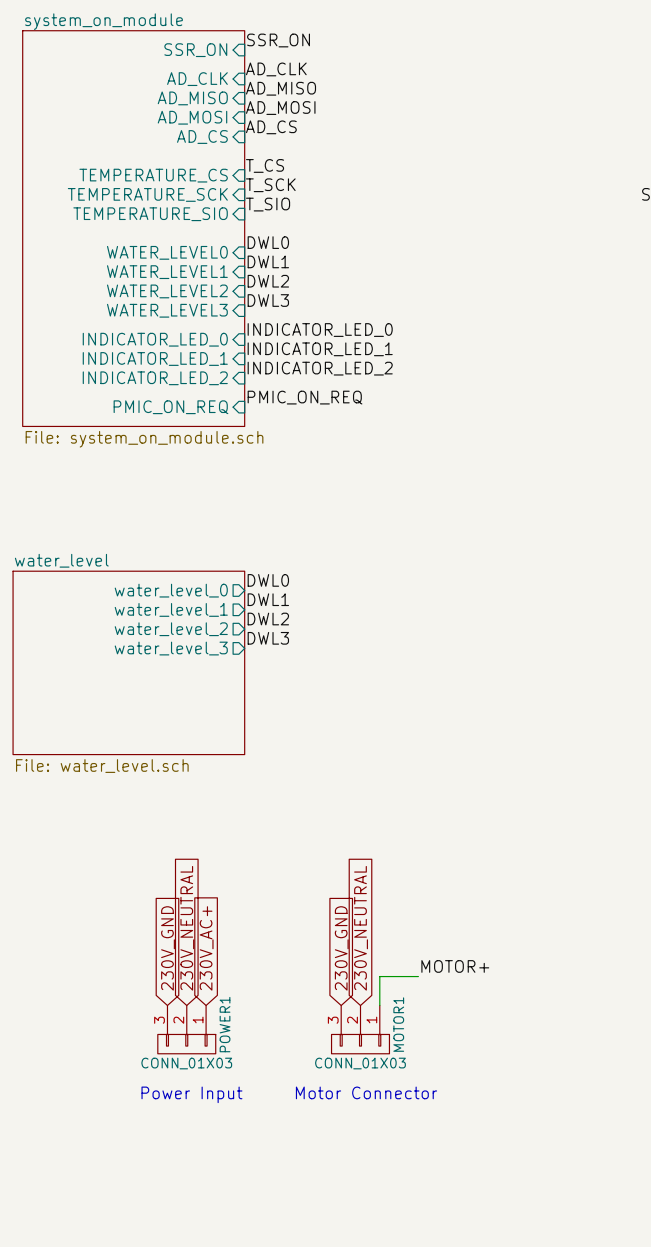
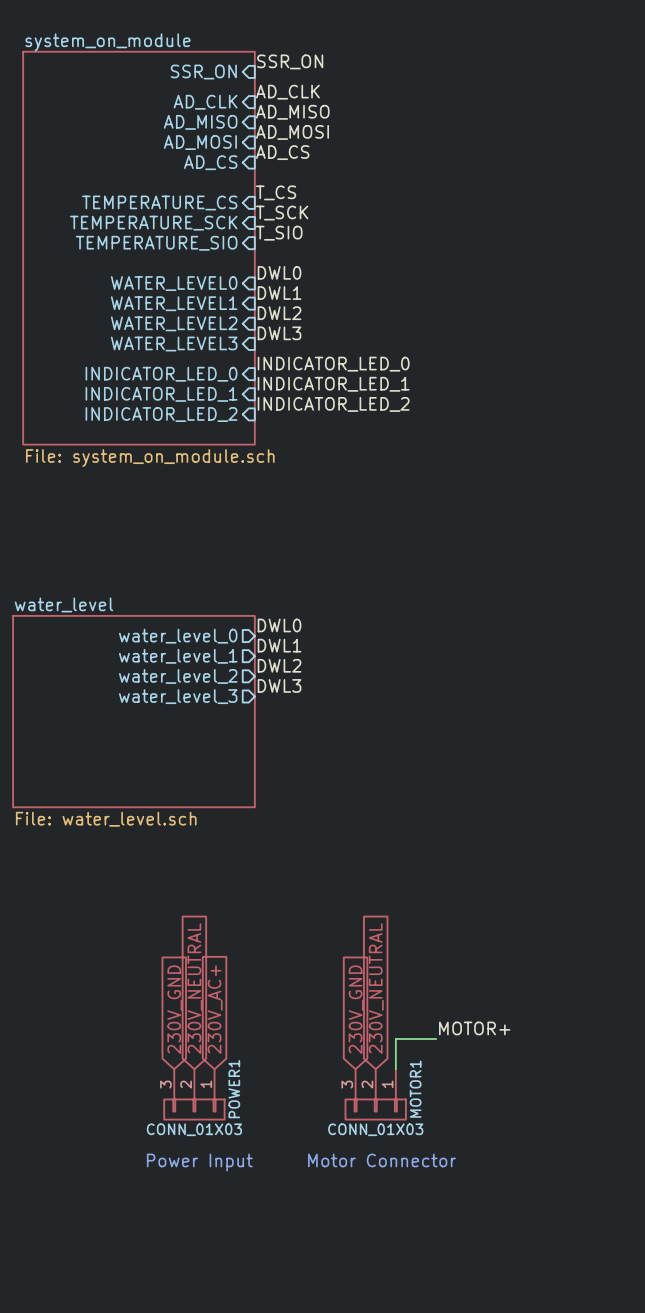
sheet system_on_module: none -> File: system_on_module.sch (138, 248)
sheet system_on_module: File: system_on_module.sch (133, 228) -> none
label: PMIC_ON_REQ (305, 397) -> none
sheet pin: PMIC_ON_REQ (170, 407) -> none

